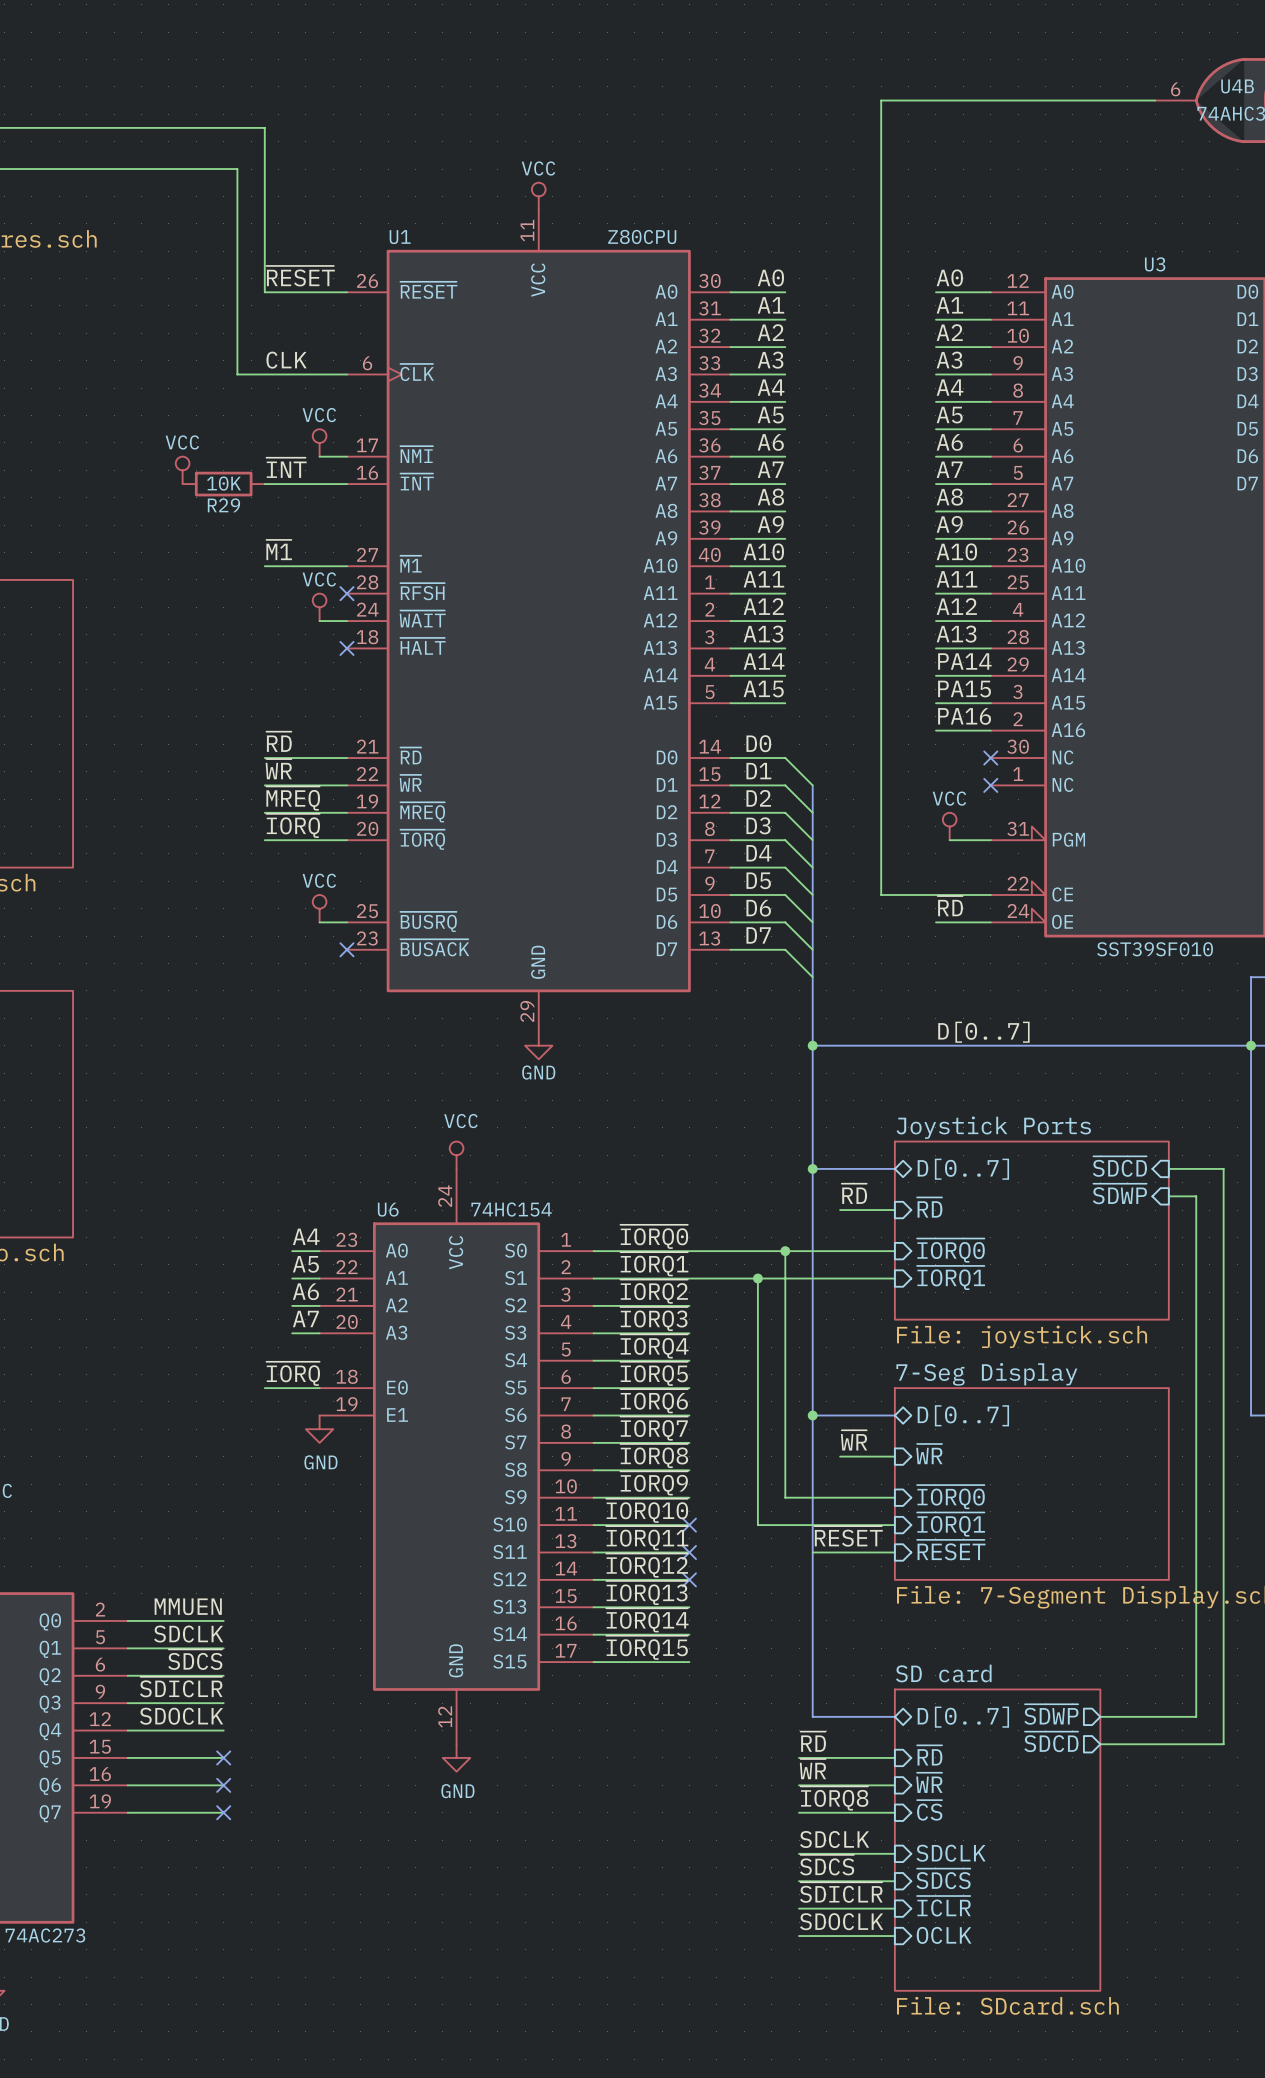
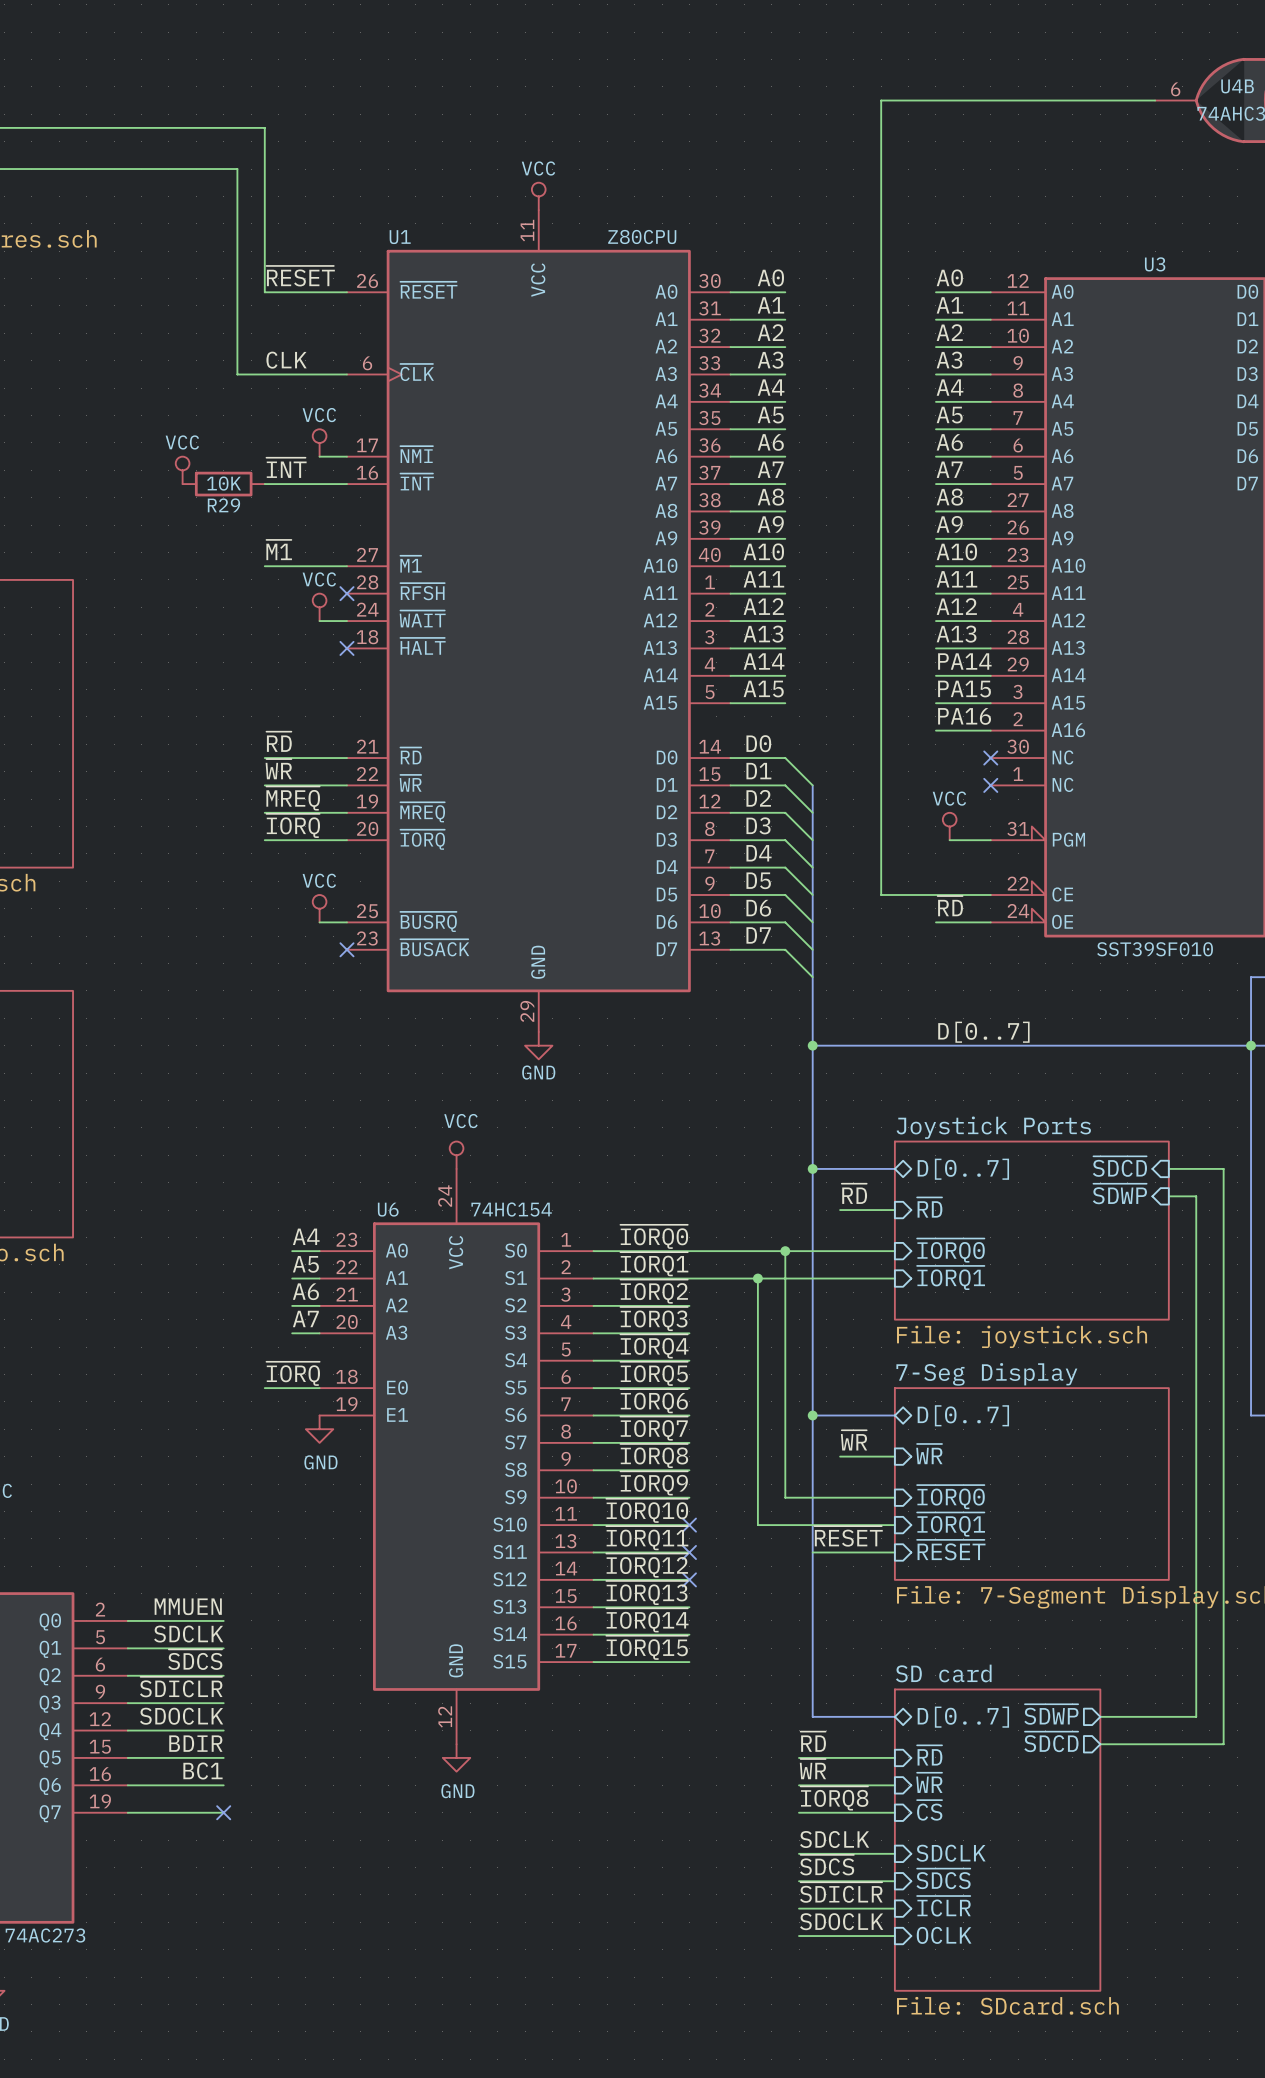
label: none -> BDIR (195, 1743)
no-connect mark: (223, 1757) -> none
label: none -> BC1 (202, 1771)
no-connect mark: (223, 1785) -> none

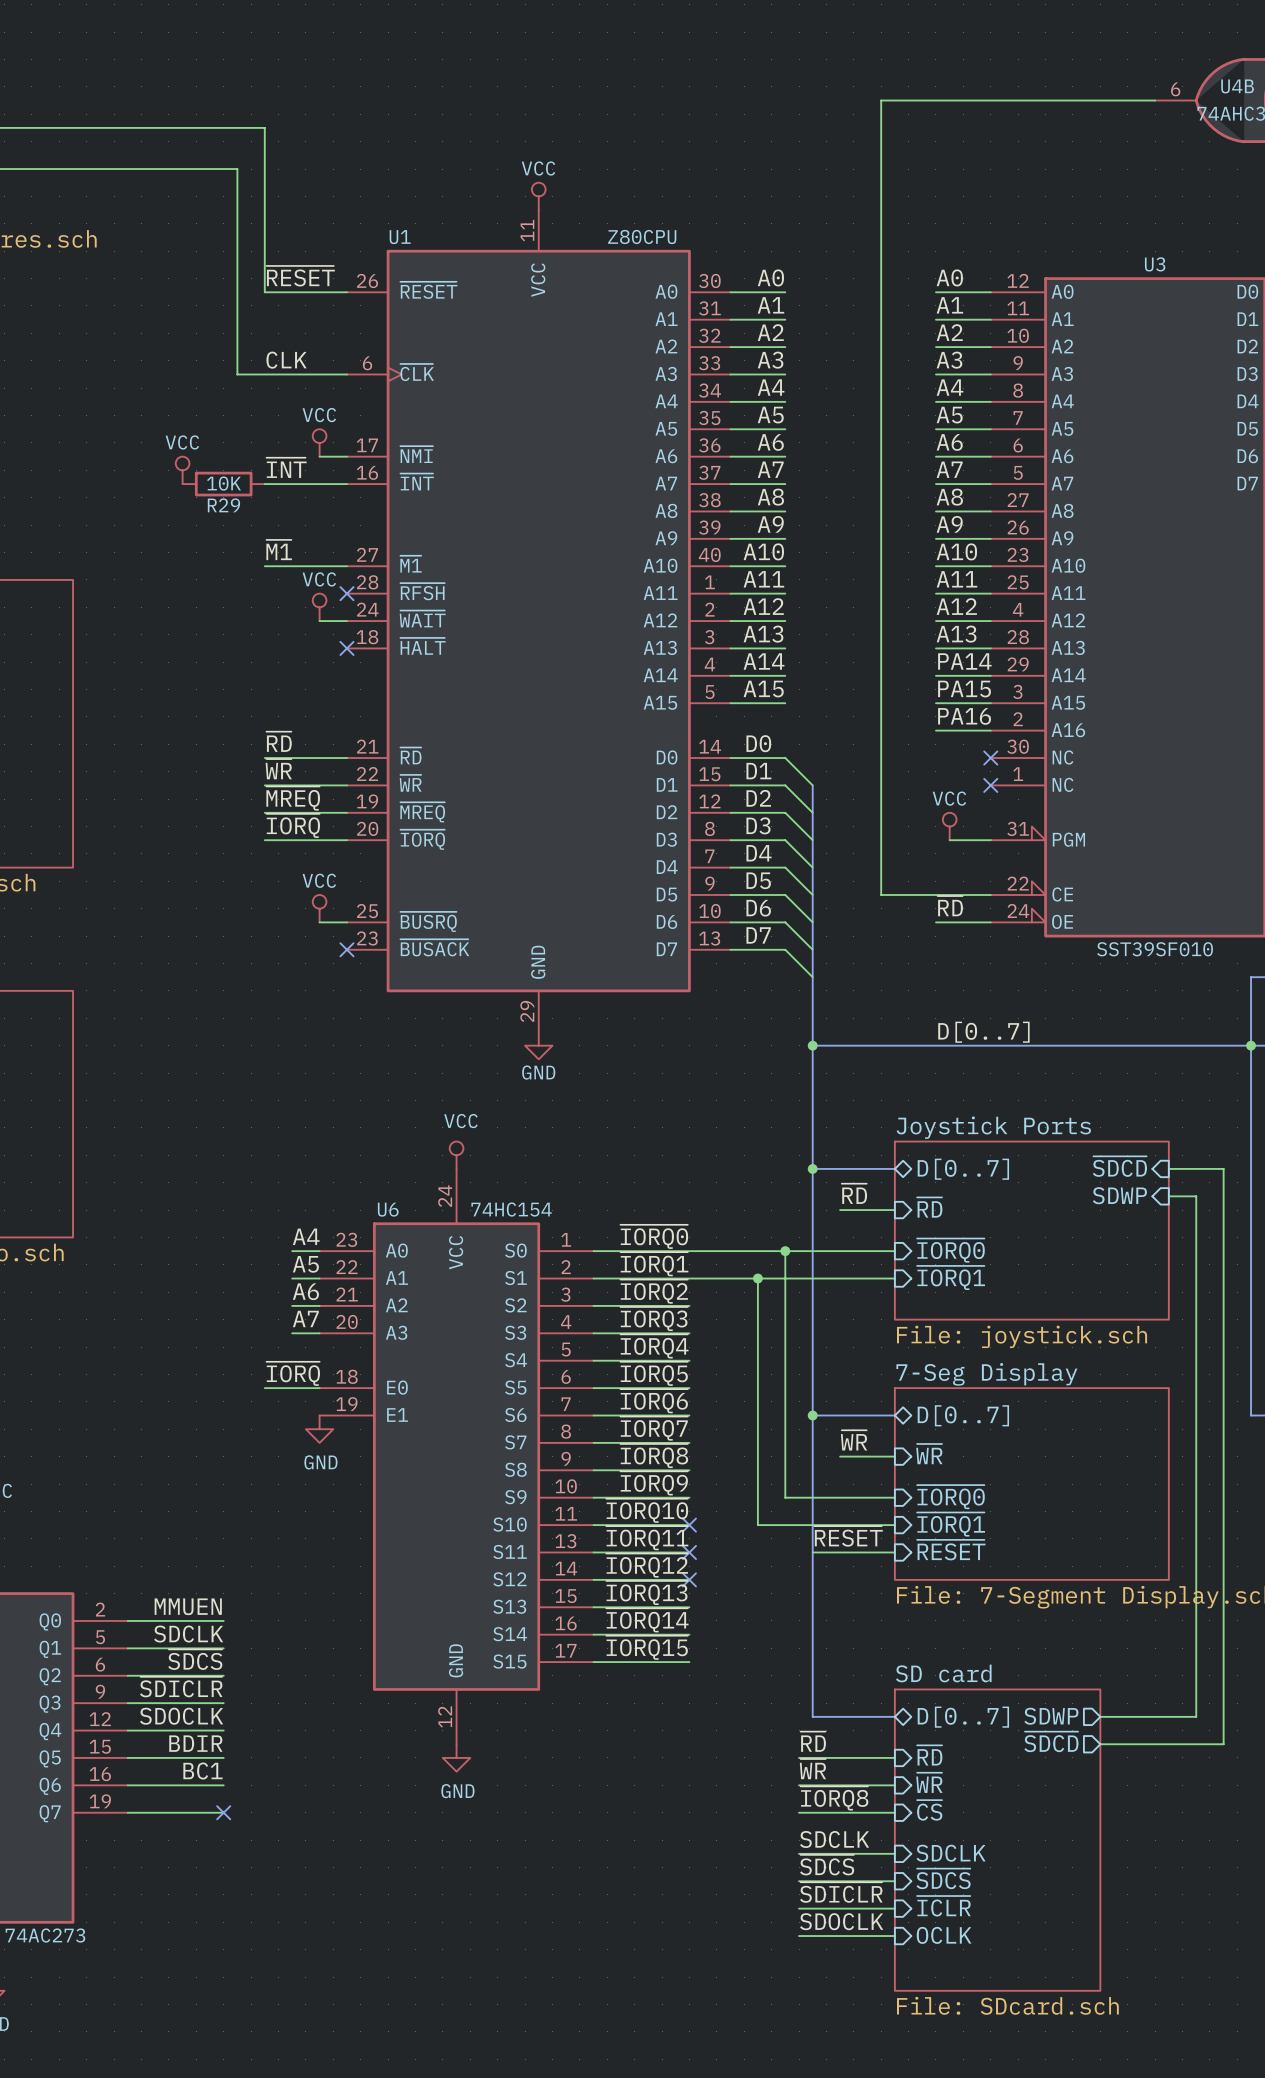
sheet pin: ~{SDWP} (1119, 1193) -> SDWP (1119, 1195)
sheet pin: ~{SDWP} (1051, 1714) -> SDWP (1051, 1716)

